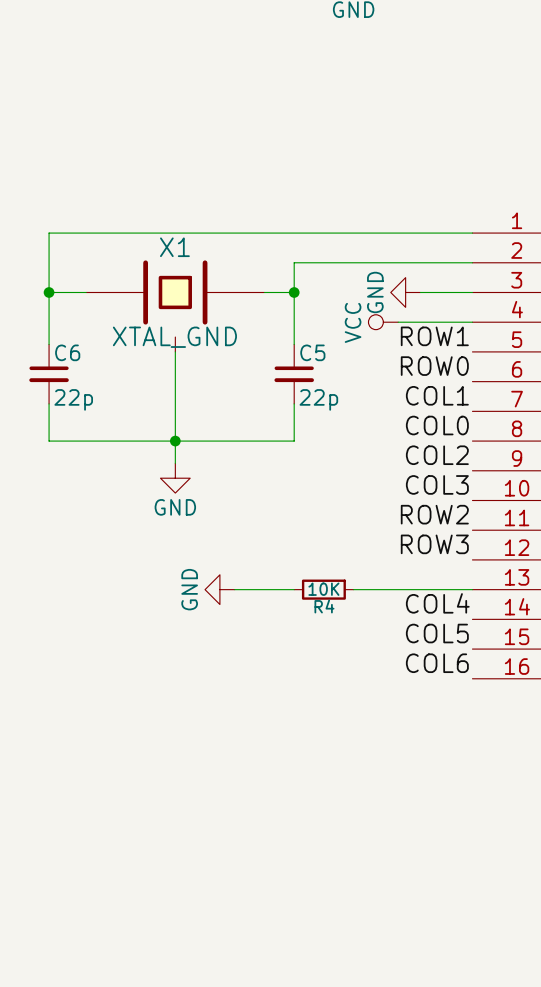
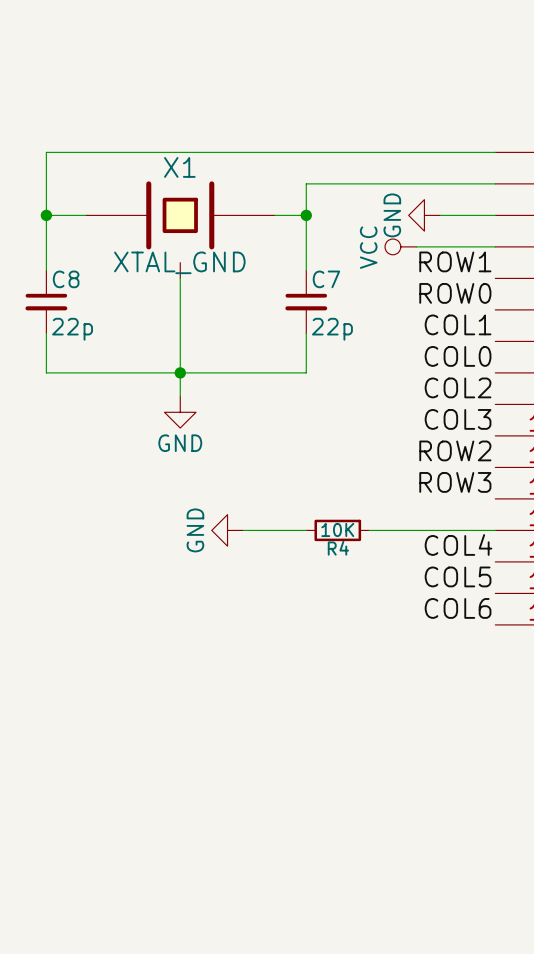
C6 name: C6 (67, 352) -> C8 (66, 279)
C5 name: C5 (312, 352) -> C7 (326, 279)

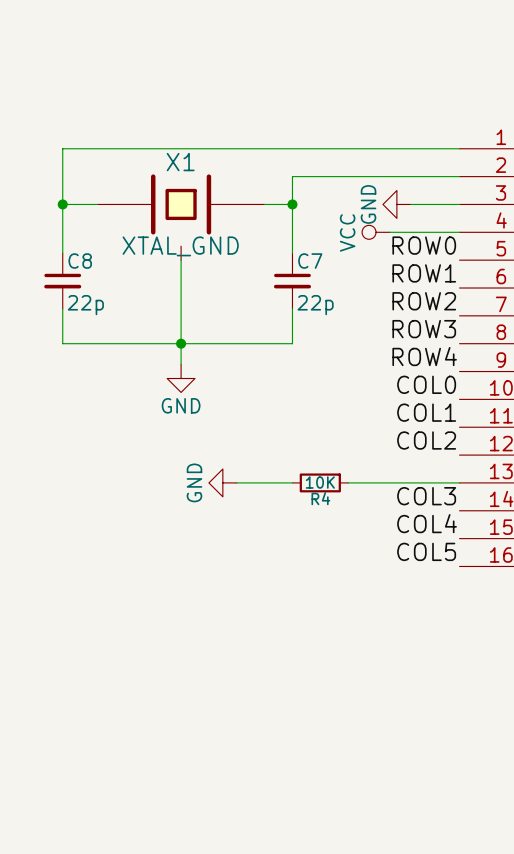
label: ROW1 (455, 261) -> ROW0 (424, 245)
label: ROW0 (455, 293) -> ROW1 (424, 273)
label: COL1 (458, 324) -> ROW2 (424, 301)
label: COL0 (458, 356) -> ROW3 (424, 329)
label: COL2 (458, 387) -> ROW4 (424, 356)
label: COL3 (458, 419) -> COL0 (426, 384)
label: ROW2 (455, 450) -> COL1 (426, 412)
label: ROW3 (455, 482) -> COL2 (426, 440)
label: COL4 (458, 544) -> COL3 (426, 496)
label: COL5 (458, 576) -> COL4 (427, 523)
label: COL6 (458, 608) -> COL5 (426, 551)

